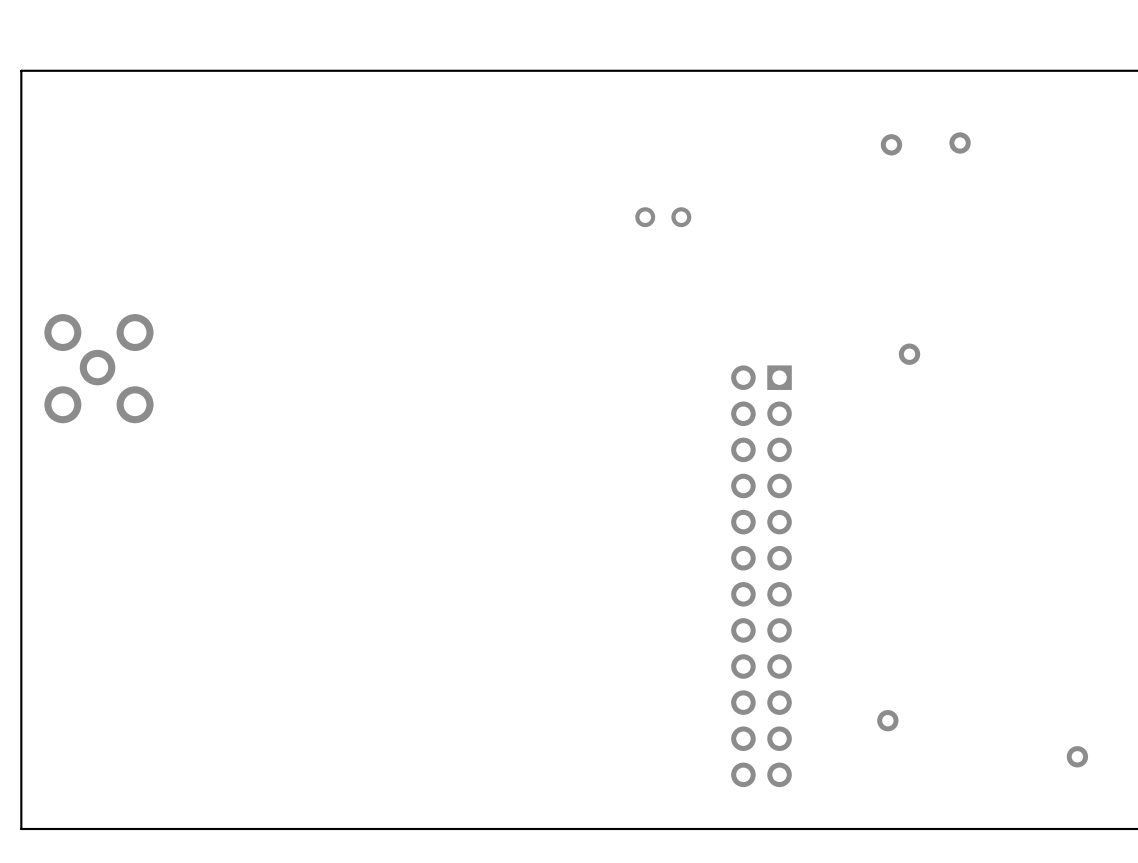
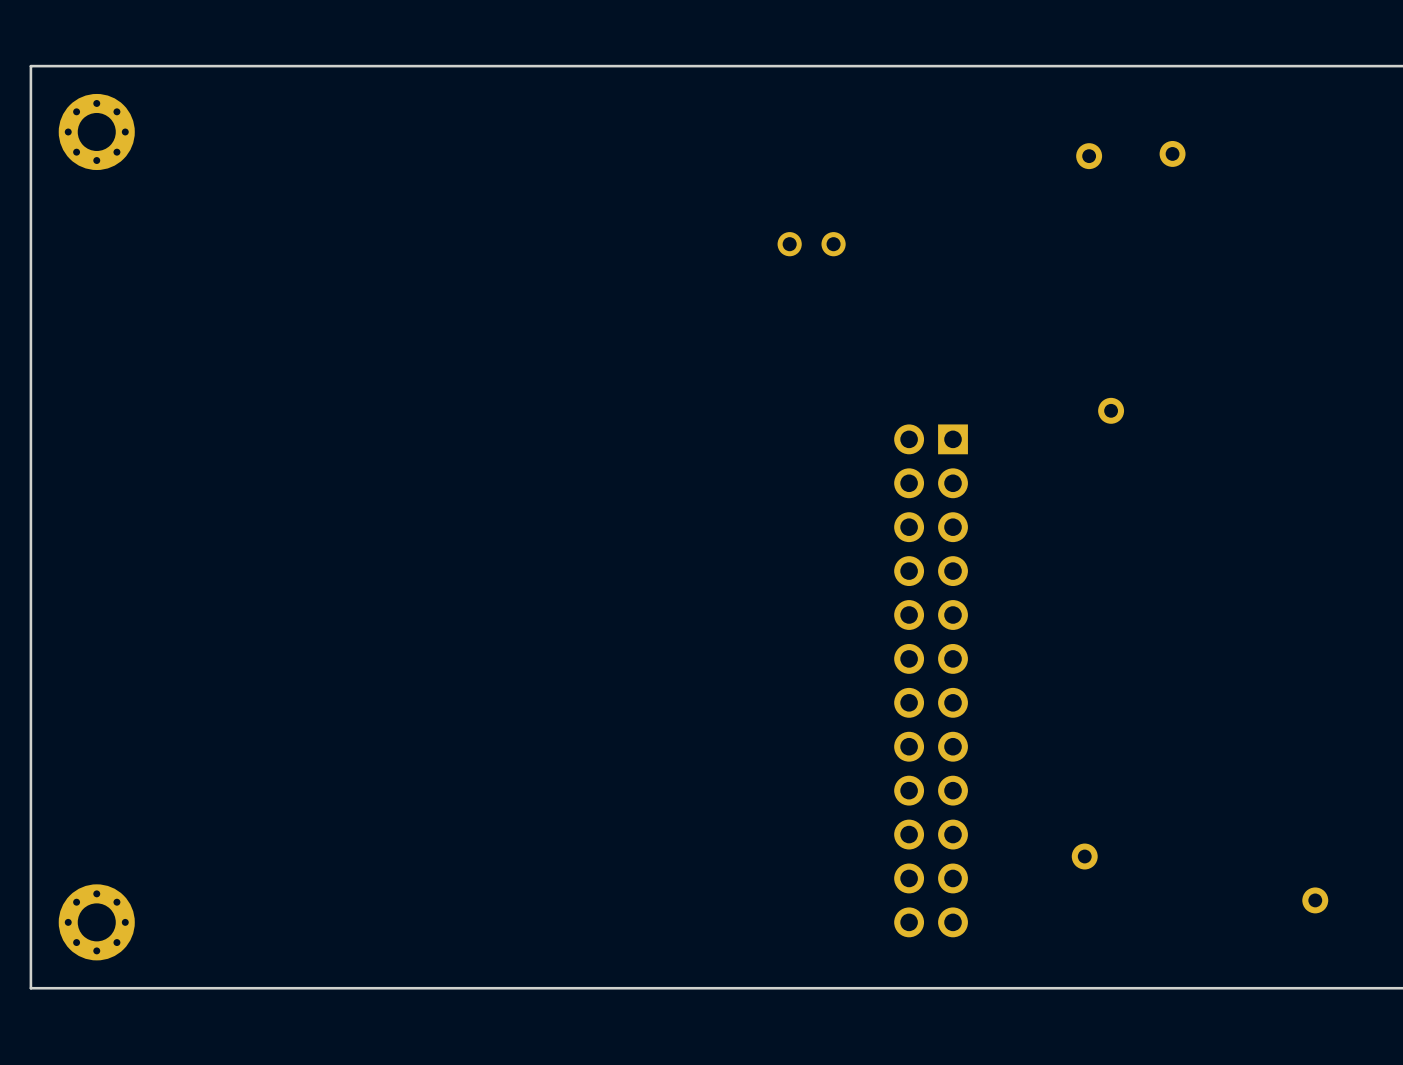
part: none -> (96, 131)
part: (98, 368) -> none
part: none -> (96, 922)

